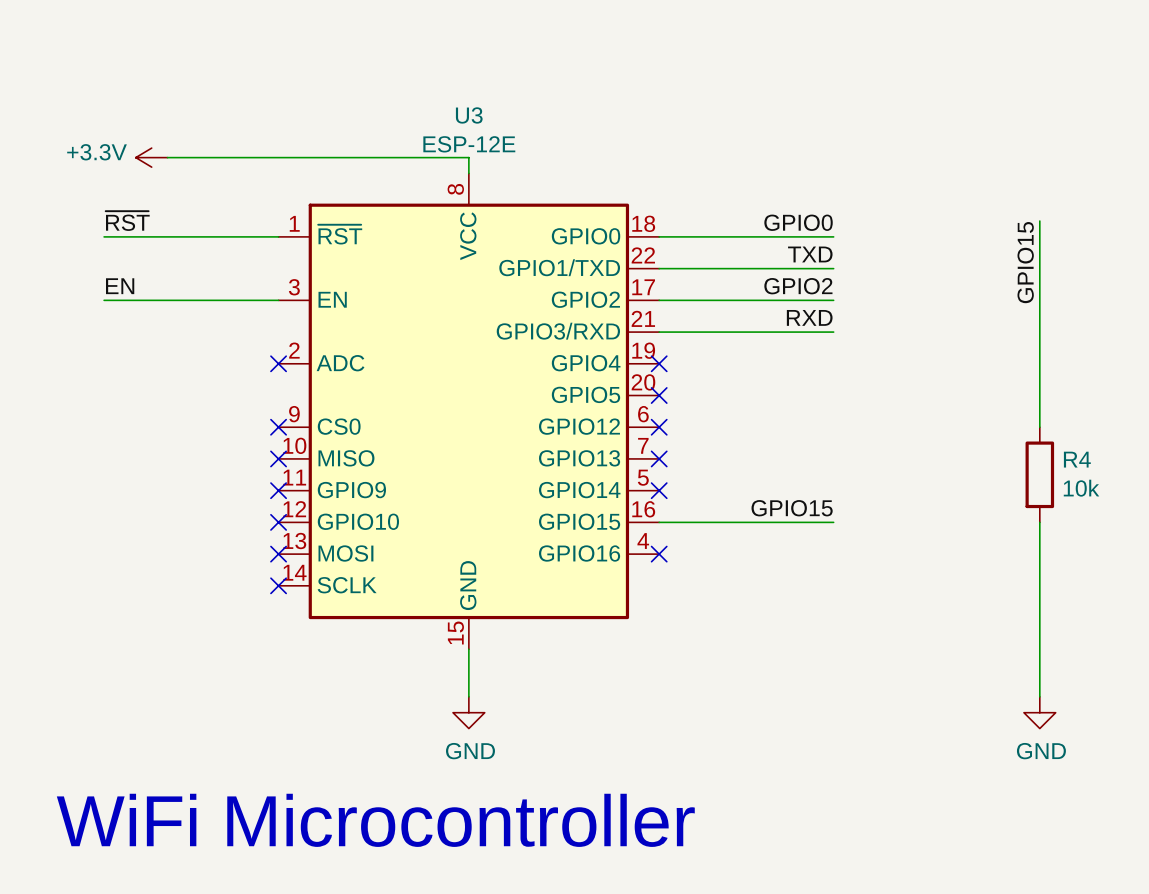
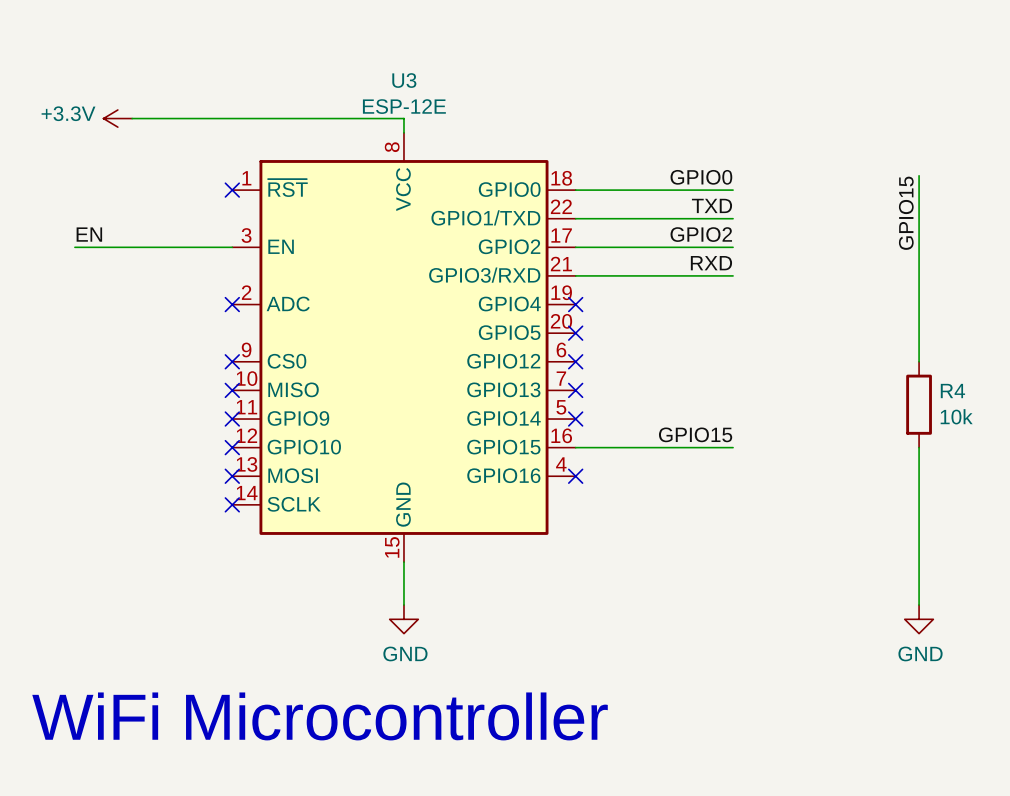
label: ~{RST} (127, 221) -> none
wire: (104, 236) (278, 236) -> none
no-connect mark: none -> (232, 190)

